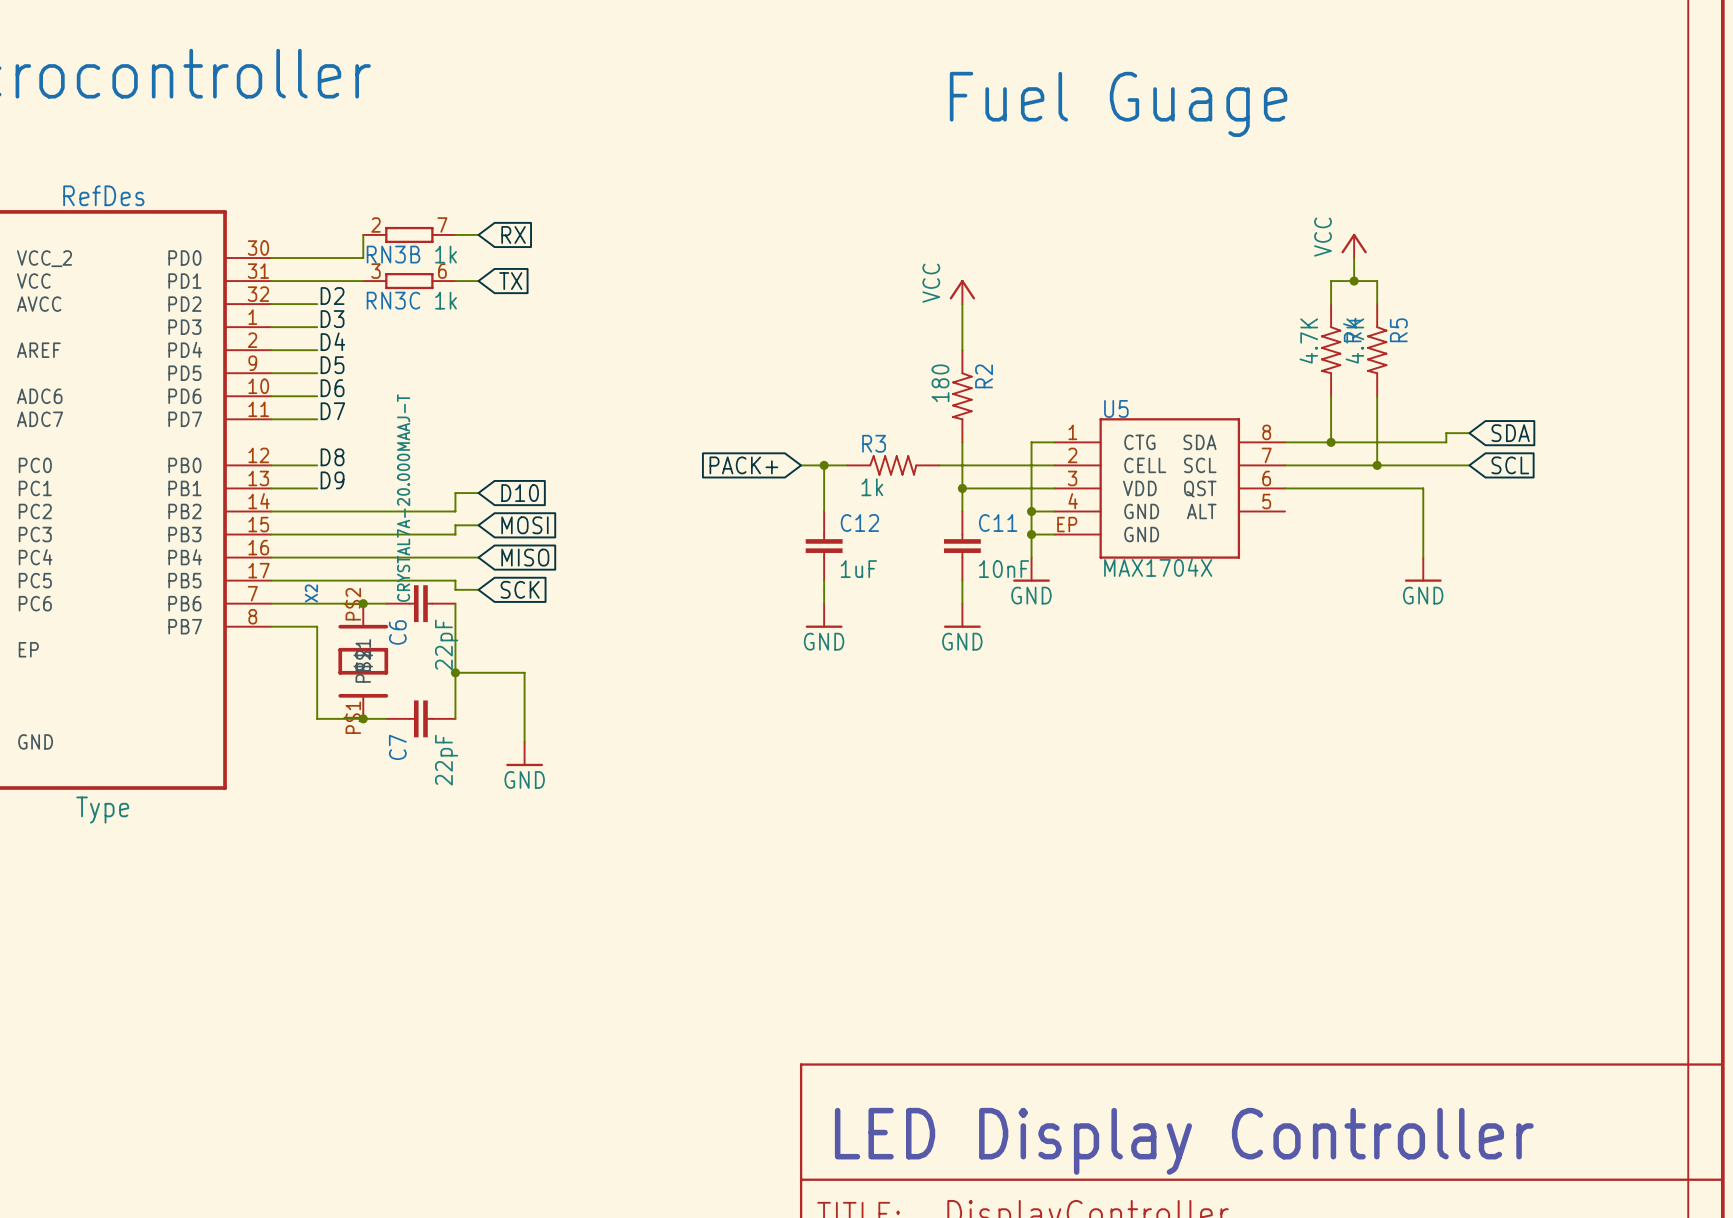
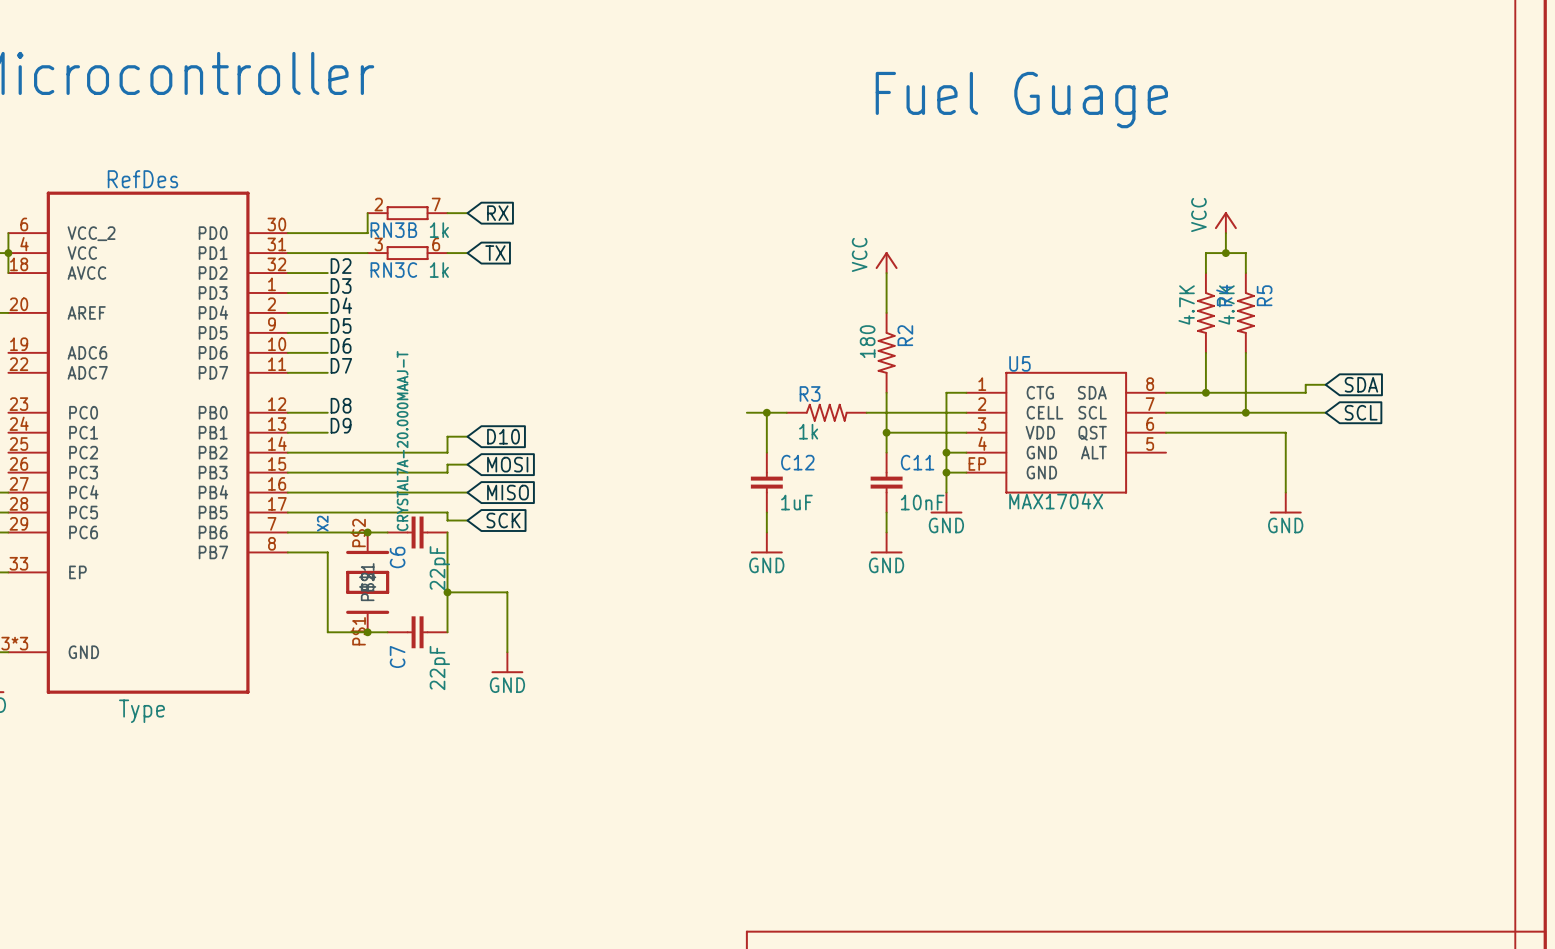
global label: PACK+ (743, 465) -> none

